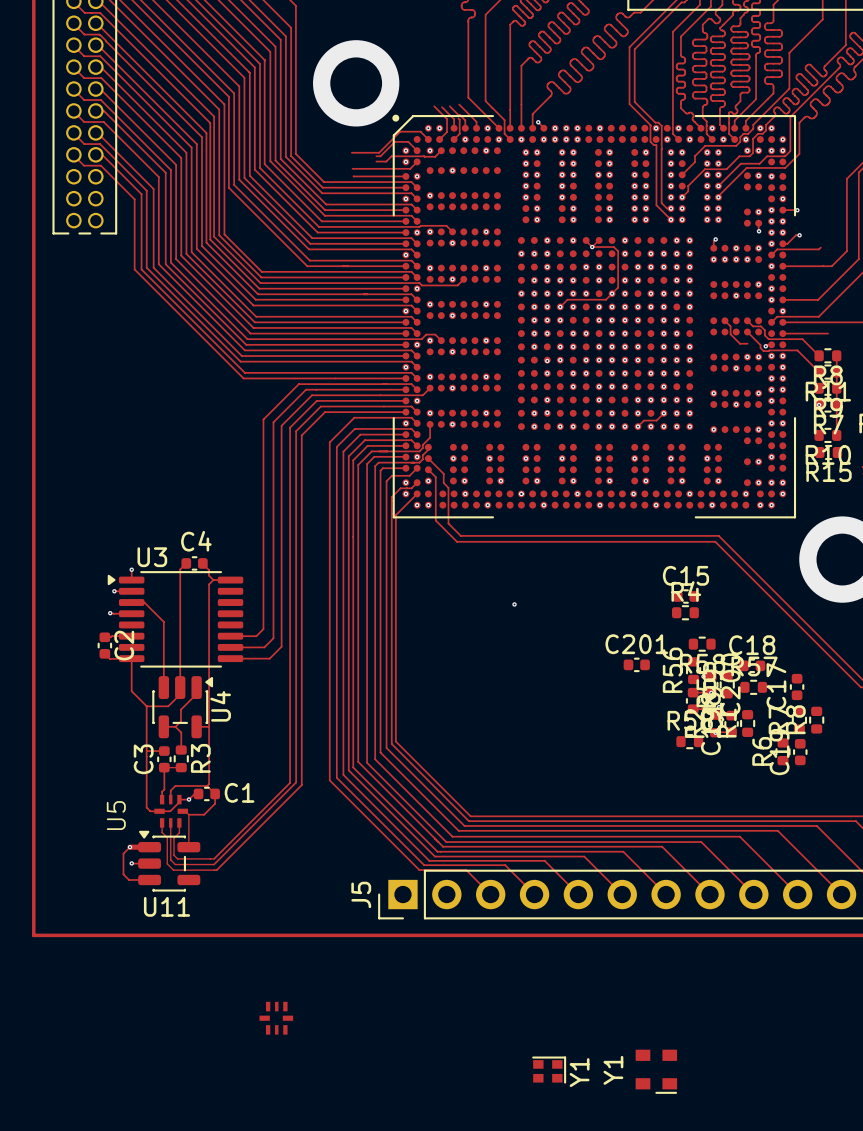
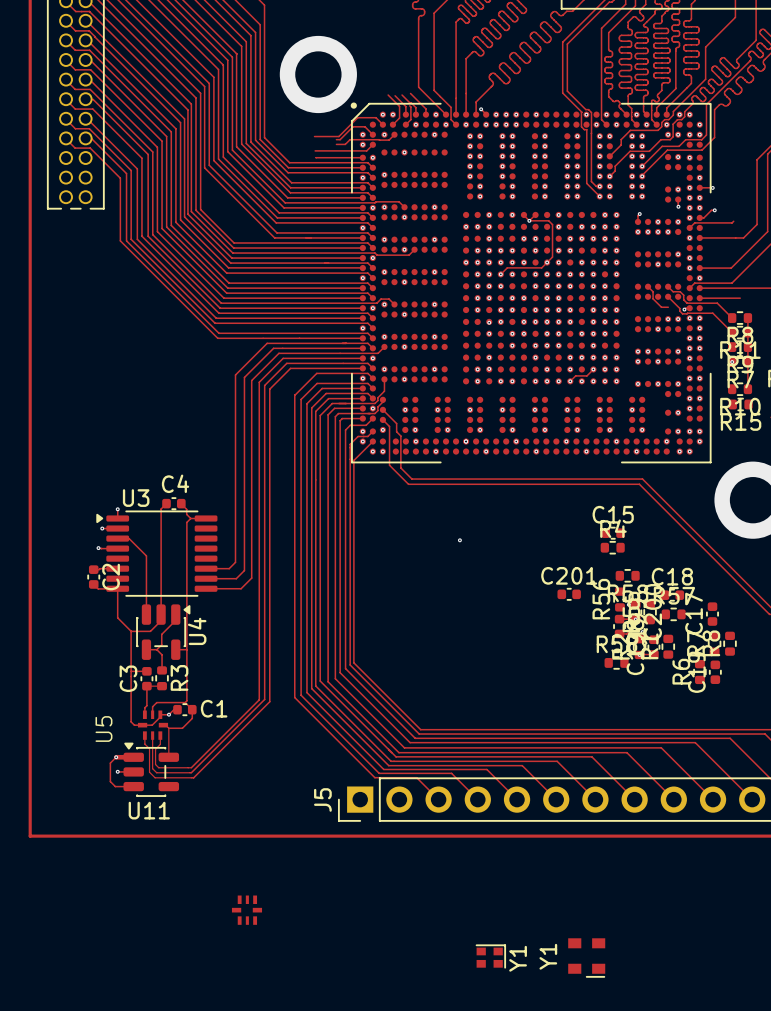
via: none -> (648, 351)
via: none -> (638, 361)
via: none -> (658, 383)
via: none -> (689, 398)
via: none -> (699, 398)

